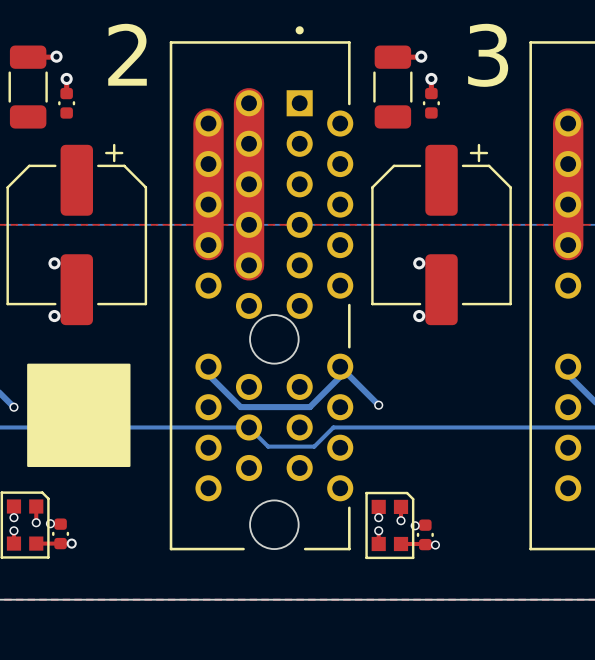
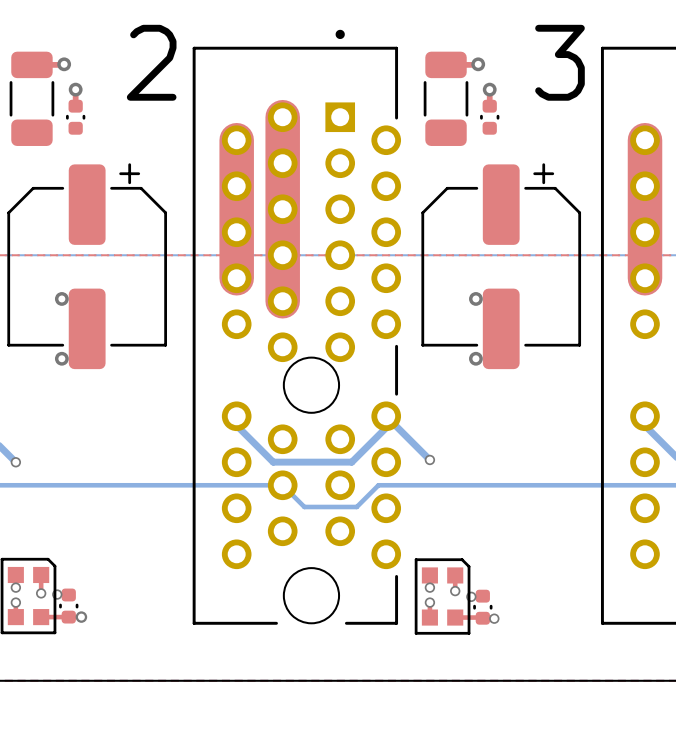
drawing: [27, 363, 131, 467] -> none

